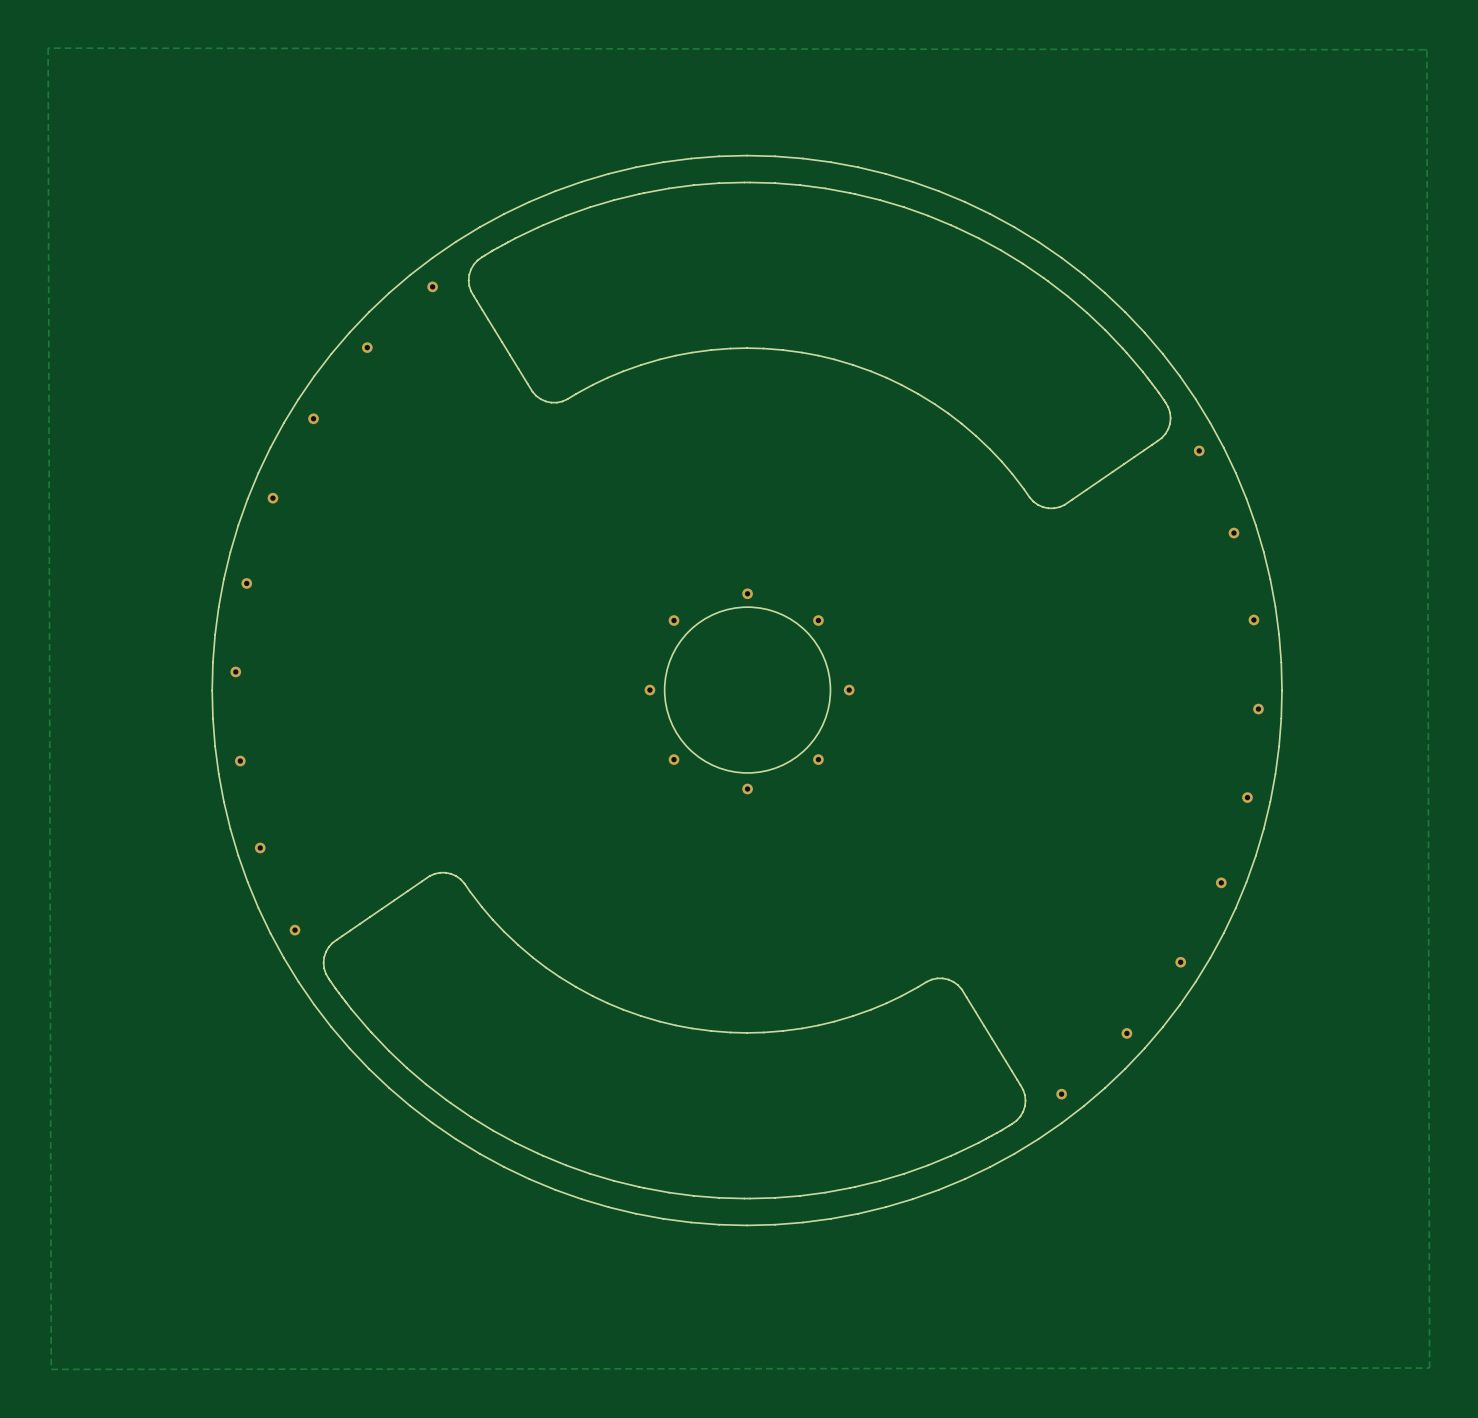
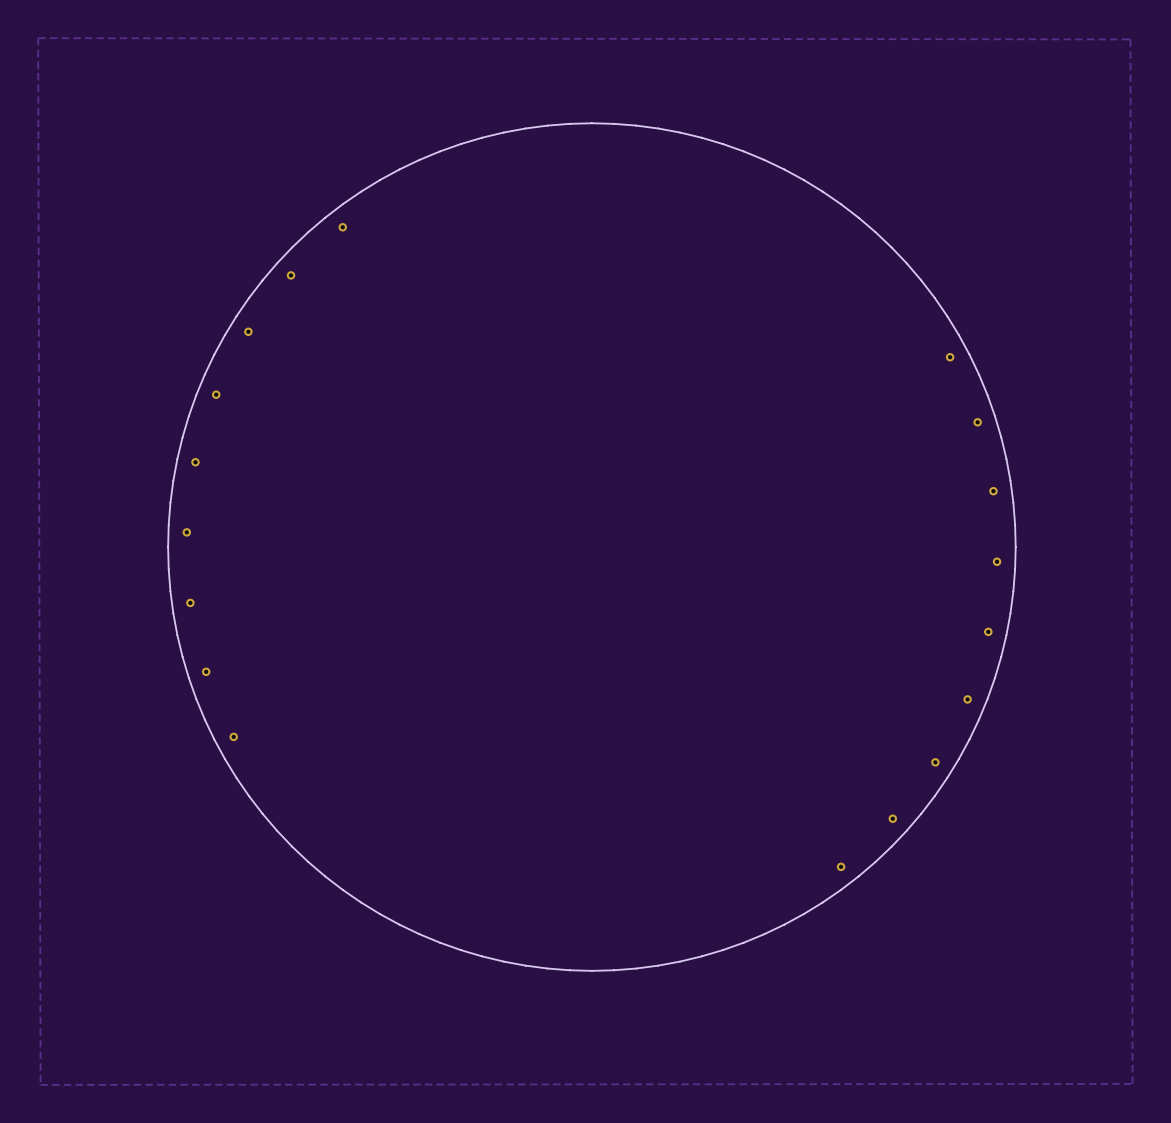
board edge: (749, 182) (825, 188) (879, 200) (951, 225) (1001, 250) (1067, 296) (1105, 330) (1126, 352) (1168, 407) (1170, 423) (1165, 433) (1064, 504) (1048, 508) (1033, 501) (990, 449) (961, 423) (934, 404) (886, 377) (852, 364) (818, 355) (782, 350) (747, 348) (692, 352) (659, 359) (623, 371) (562, 401) (545, 401) (536, 395) (471, 291) (469, 274) (477, 260) (515, 238) (543, 225) (614, 200) (694, 185) (749, 182) -> none
via: (747, 593) -> none
round board edge: [663, 606, 832, 774] -> none
via: (674, 620) -> none
via: (818, 620) -> none
via: (649, 690) -> none
via: (849, 690) -> none
via: (674, 759) -> none
via: (818, 759) -> none
via: (747, 789) -> none
board edge: (445, 872) (460, 879) (504, 931) (532, 957) (559, 976) (607, 1003) (641, 1016) (675, 1025) (711, 1030) (747, 1032) (802, 1028) (834, 1021) (871, 1009) (931, 979) (948, 979) (961, 989) (1023, 1089) (1025, 1100) (1023, 1111) (1016, 1120) (1001, 1130) (927, 1165) (855, 1186) (800, 1195) (749, 1198) (694, 1195) (638, 1186) (566, 1165) (493, 1130) (426, 1084) (371, 1032) (351, 1009) (325, 973) (324, 957) (332, 943) (429, 876) (445, 872) -> none

